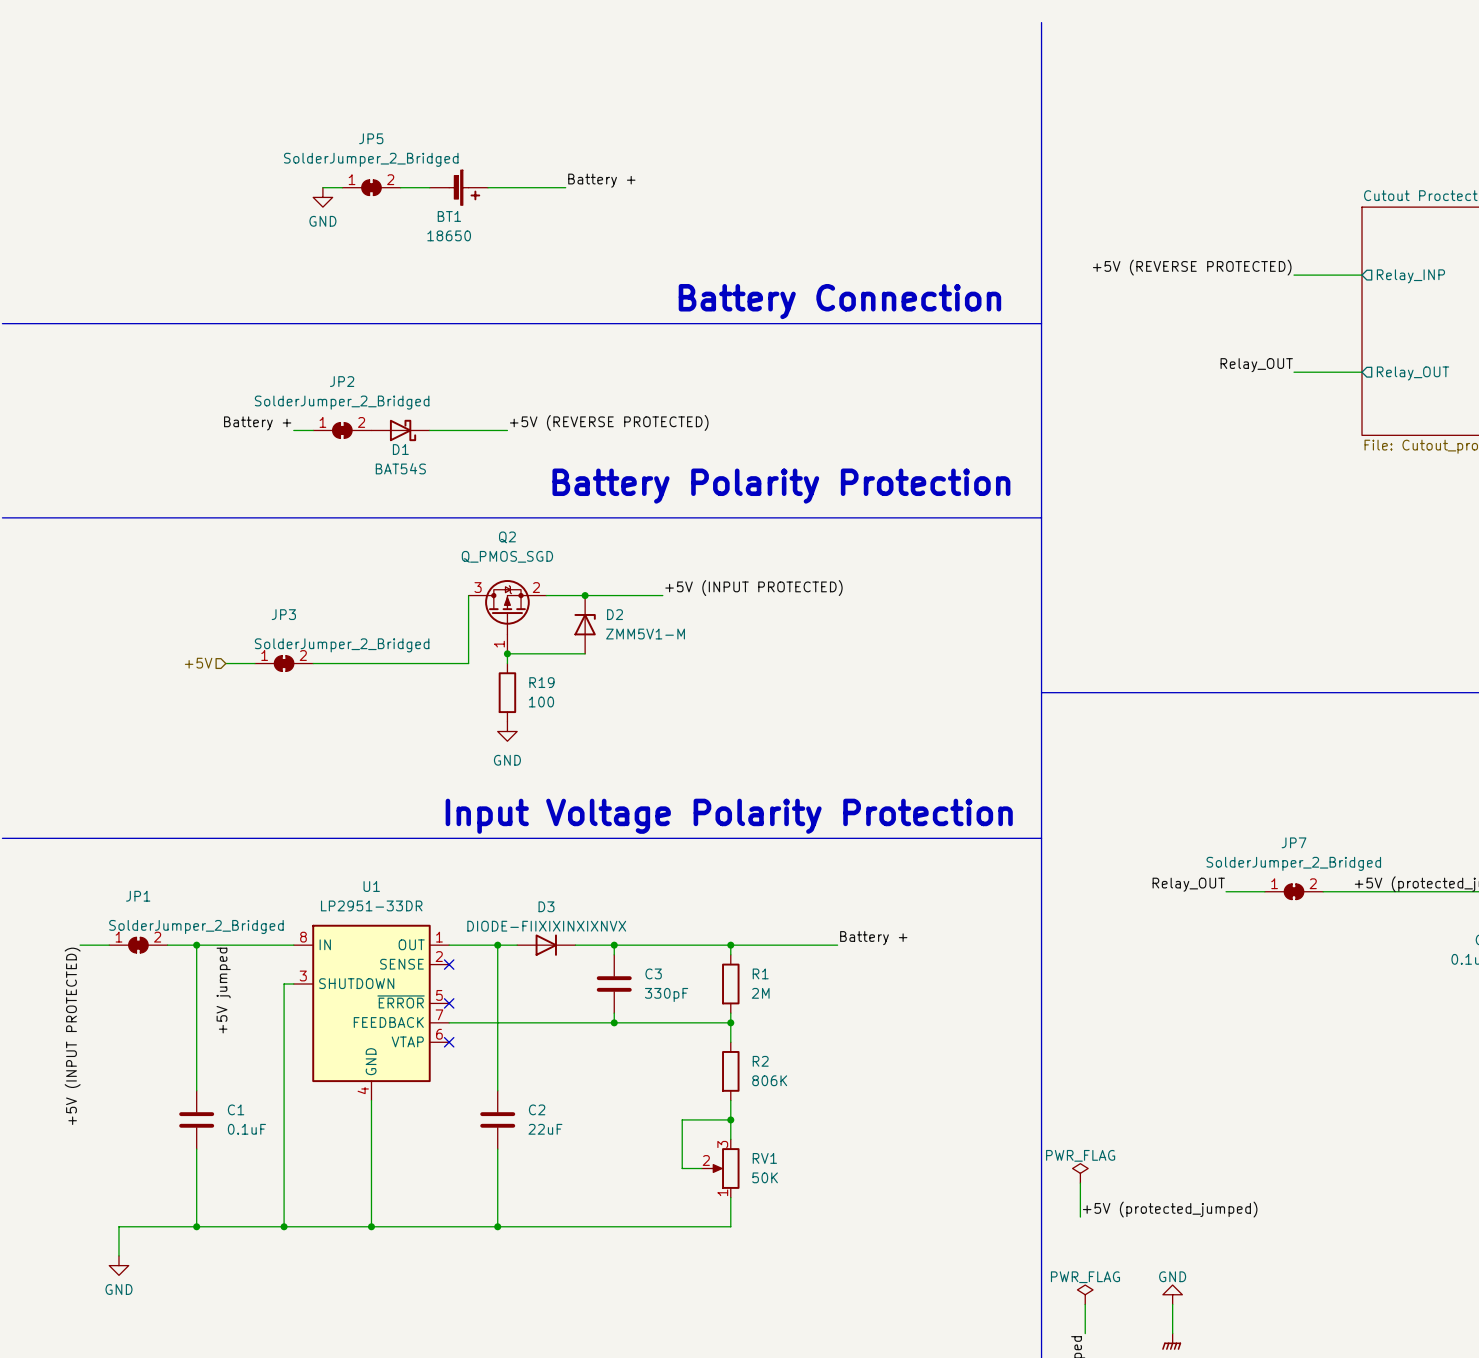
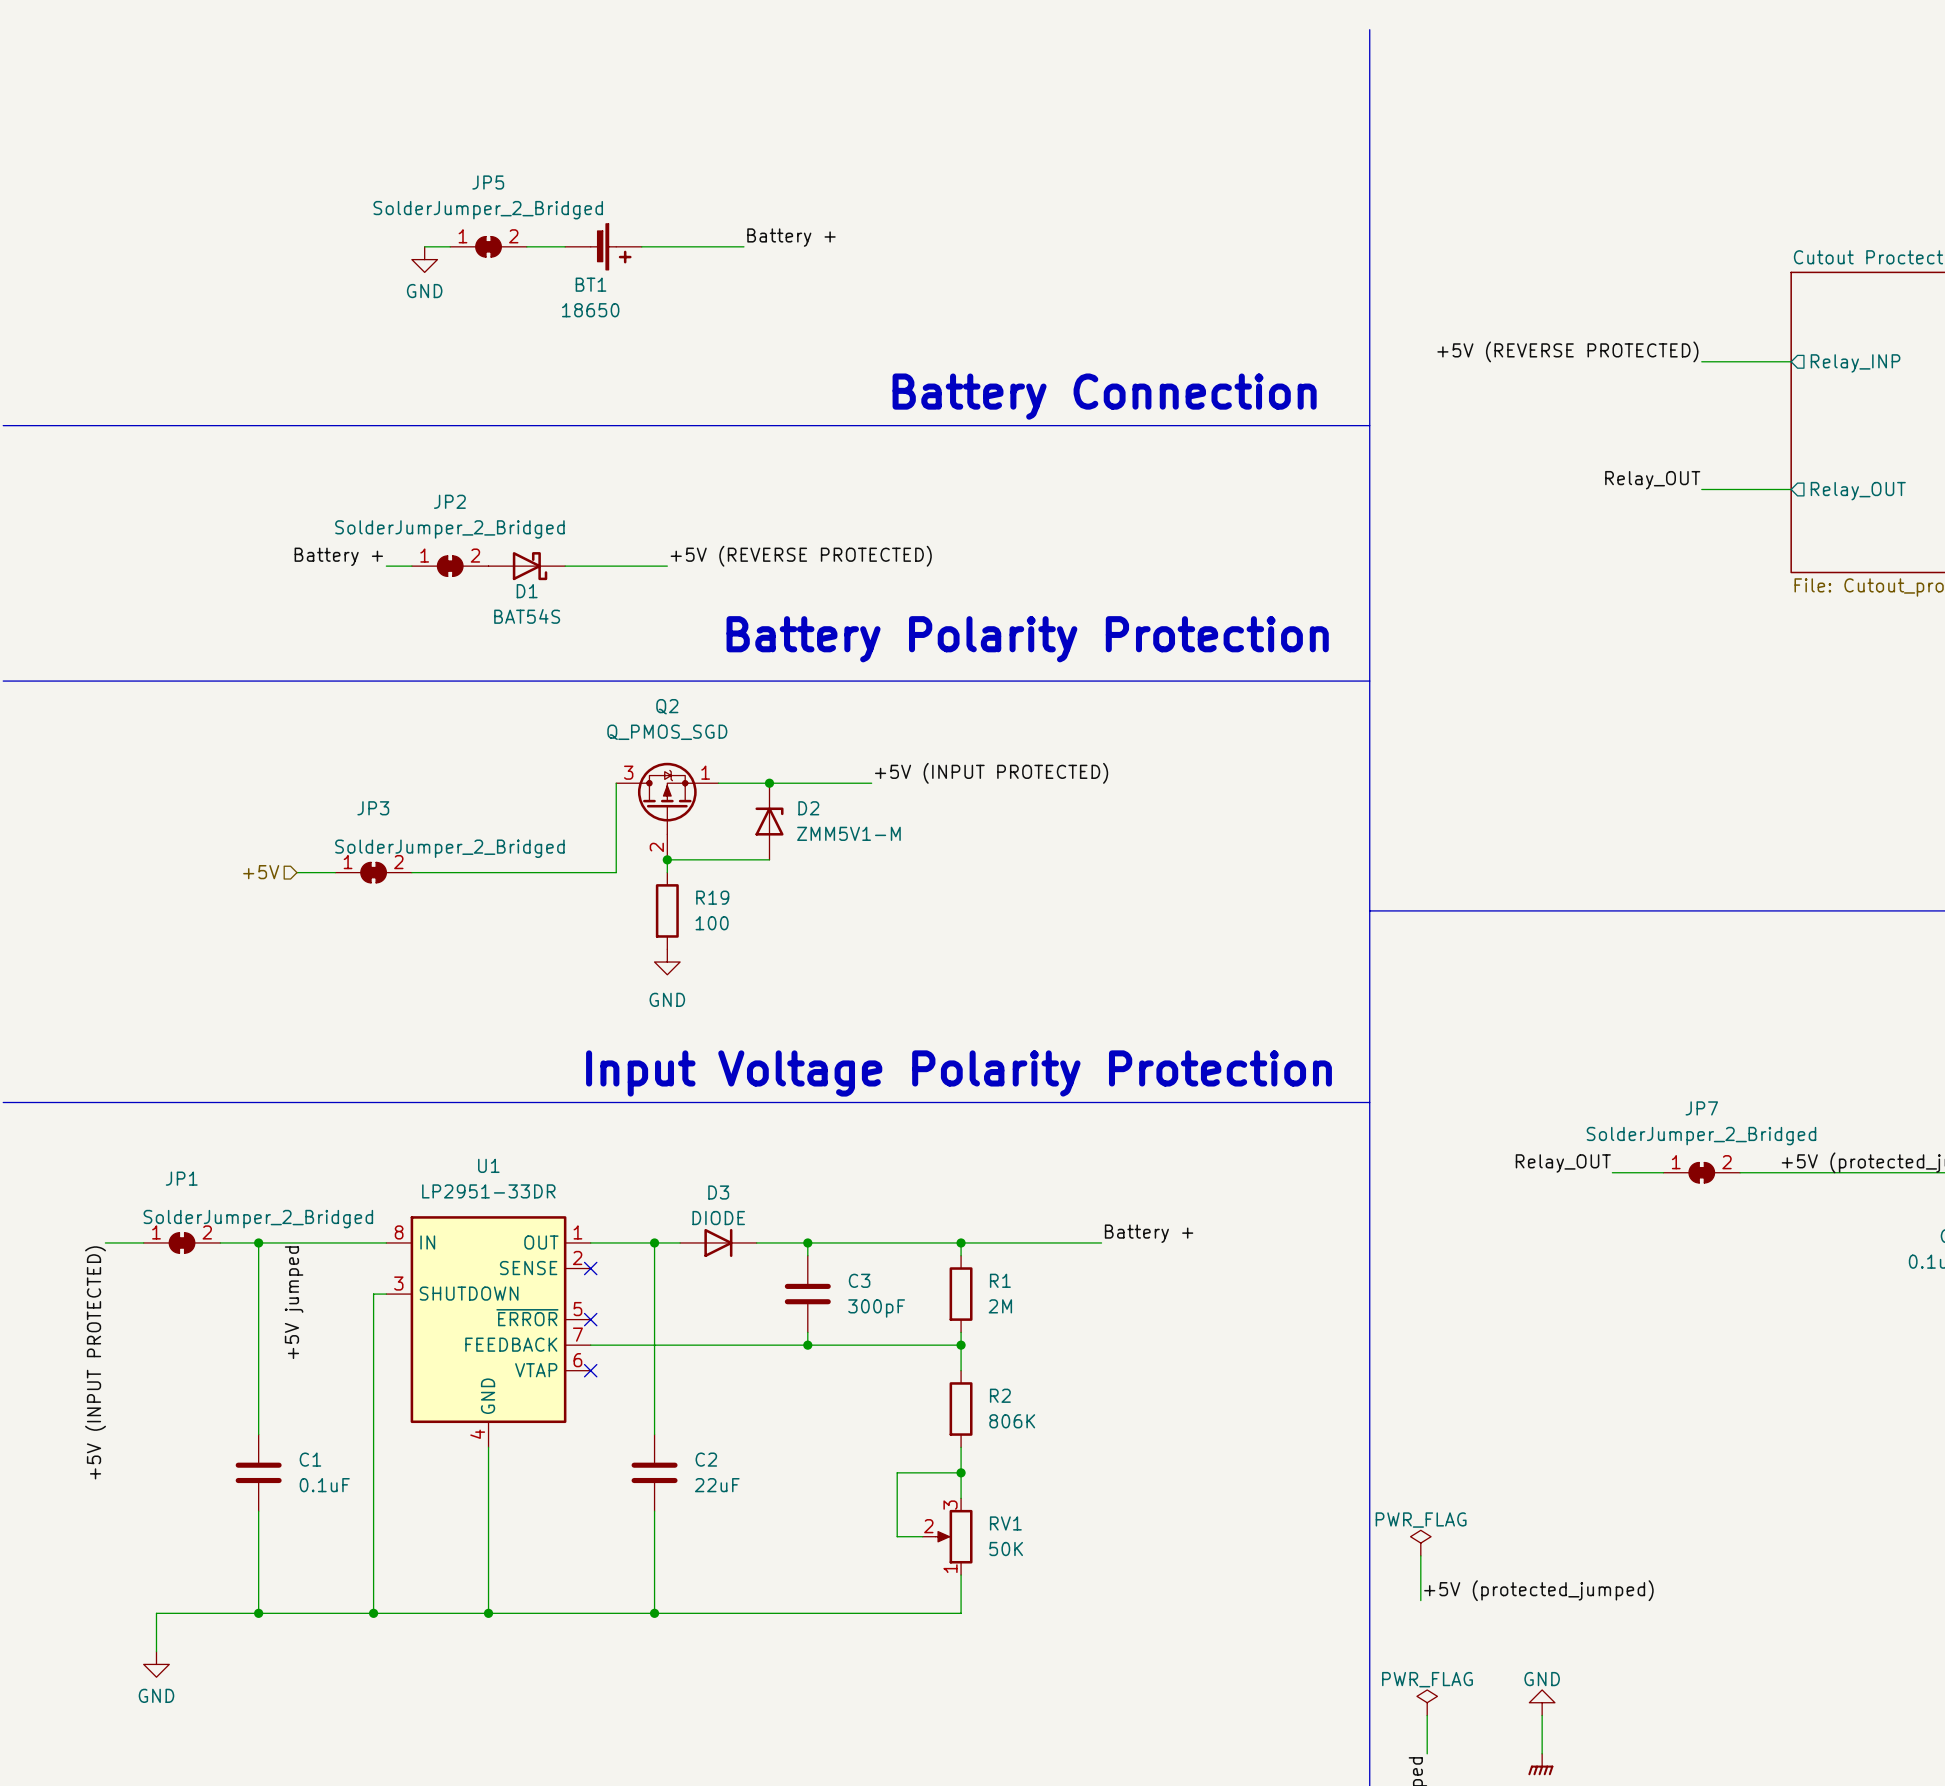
Q2 pin number: 2 (536, 587) -> 1 (705, 772)
Q2 pin number: 1 (499, 644) -> 2 (656, 847)
D3 value: DIODE-FIIXIXINXIXNVX (546, 926) -> DIODE (718, 1218)
C3 value: 330pF (666, 994) -> 300pF (876, 1308)

